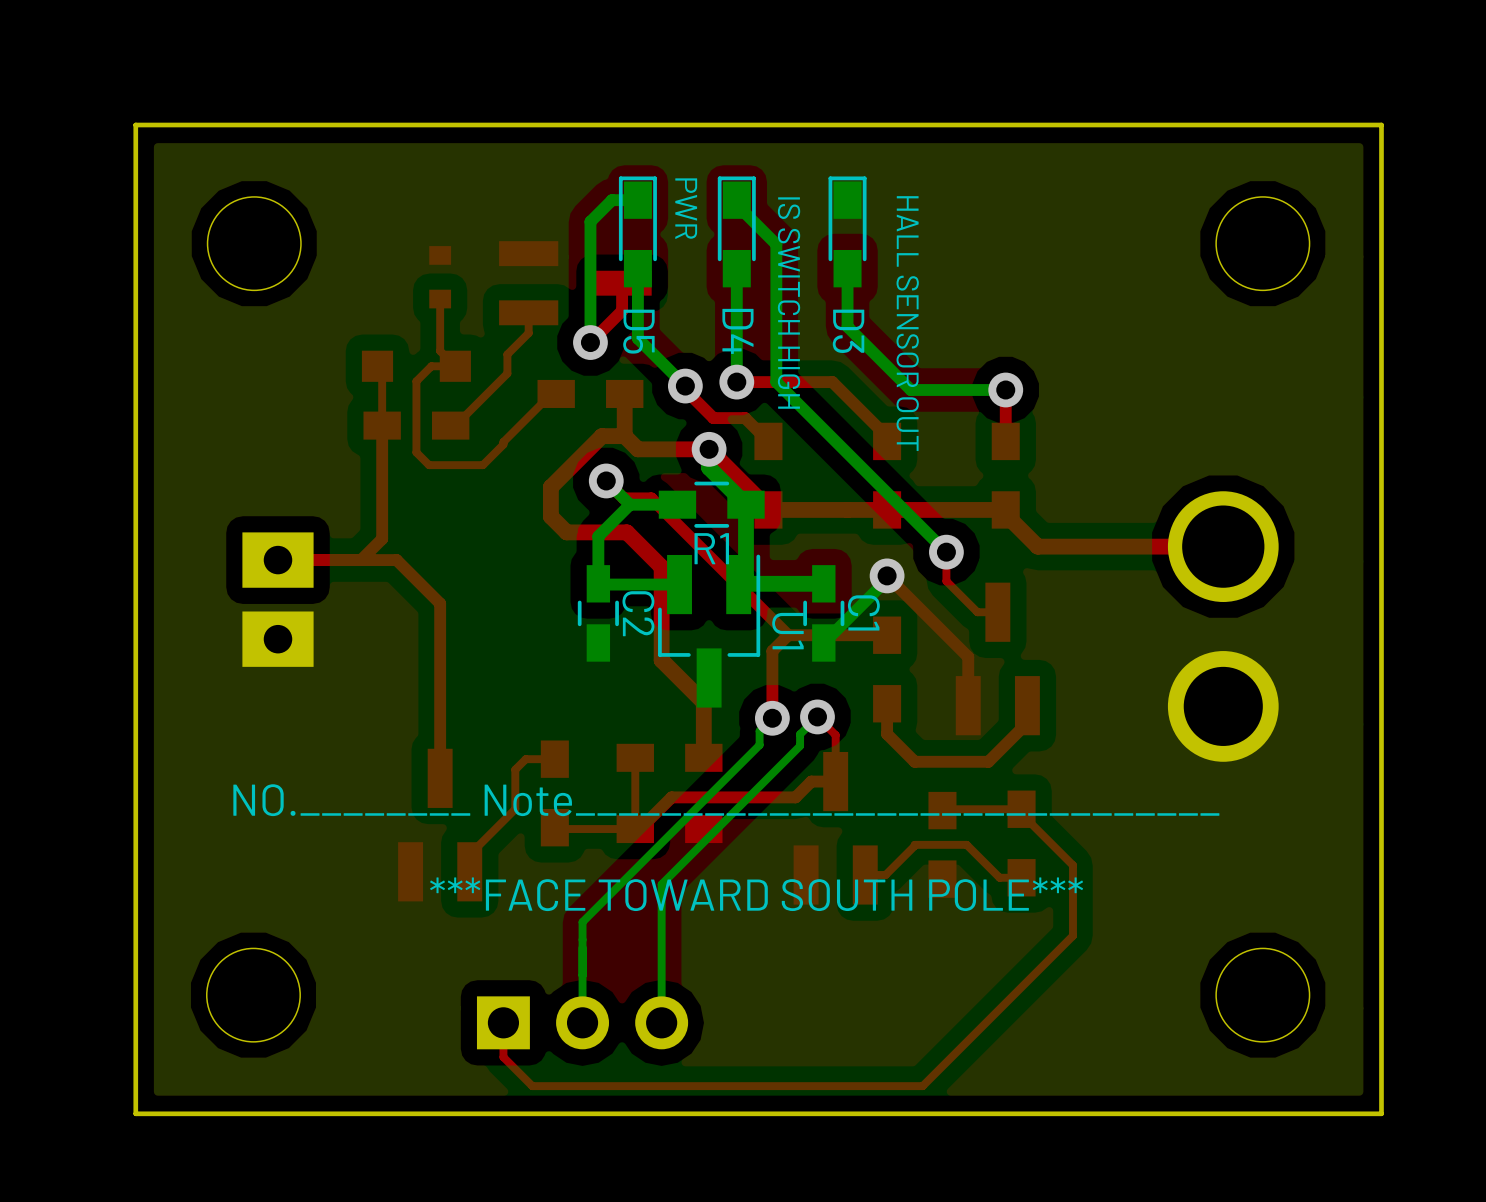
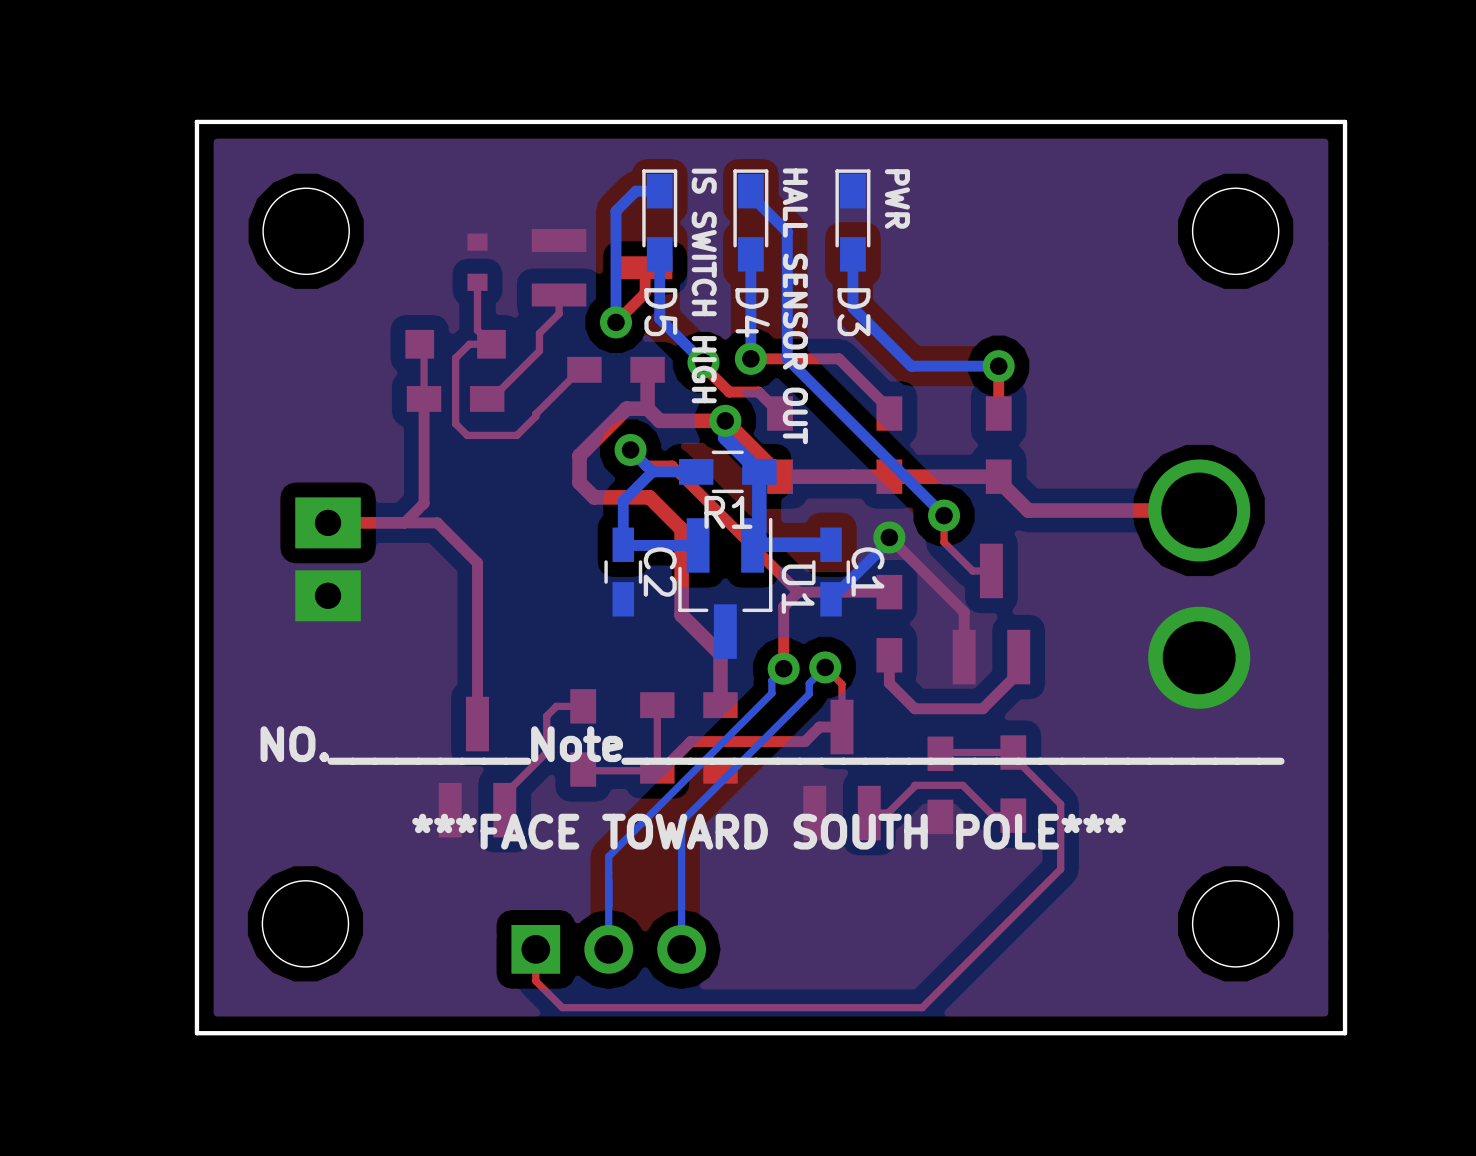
text position: PWR (686, 208) -> PWR (897, 198)
text: none -> IS SWITCH HIGH (704, 285)
text: IS SWITCH HIGH (789, 303) -> HALL SENSOR OUT (795, 306)
text: HALL SENSOR OUT (907, 323) -> none
text: NO.________ Note______________________________ (726, 800) -> NO._________Note______________________________ (772, 745)

